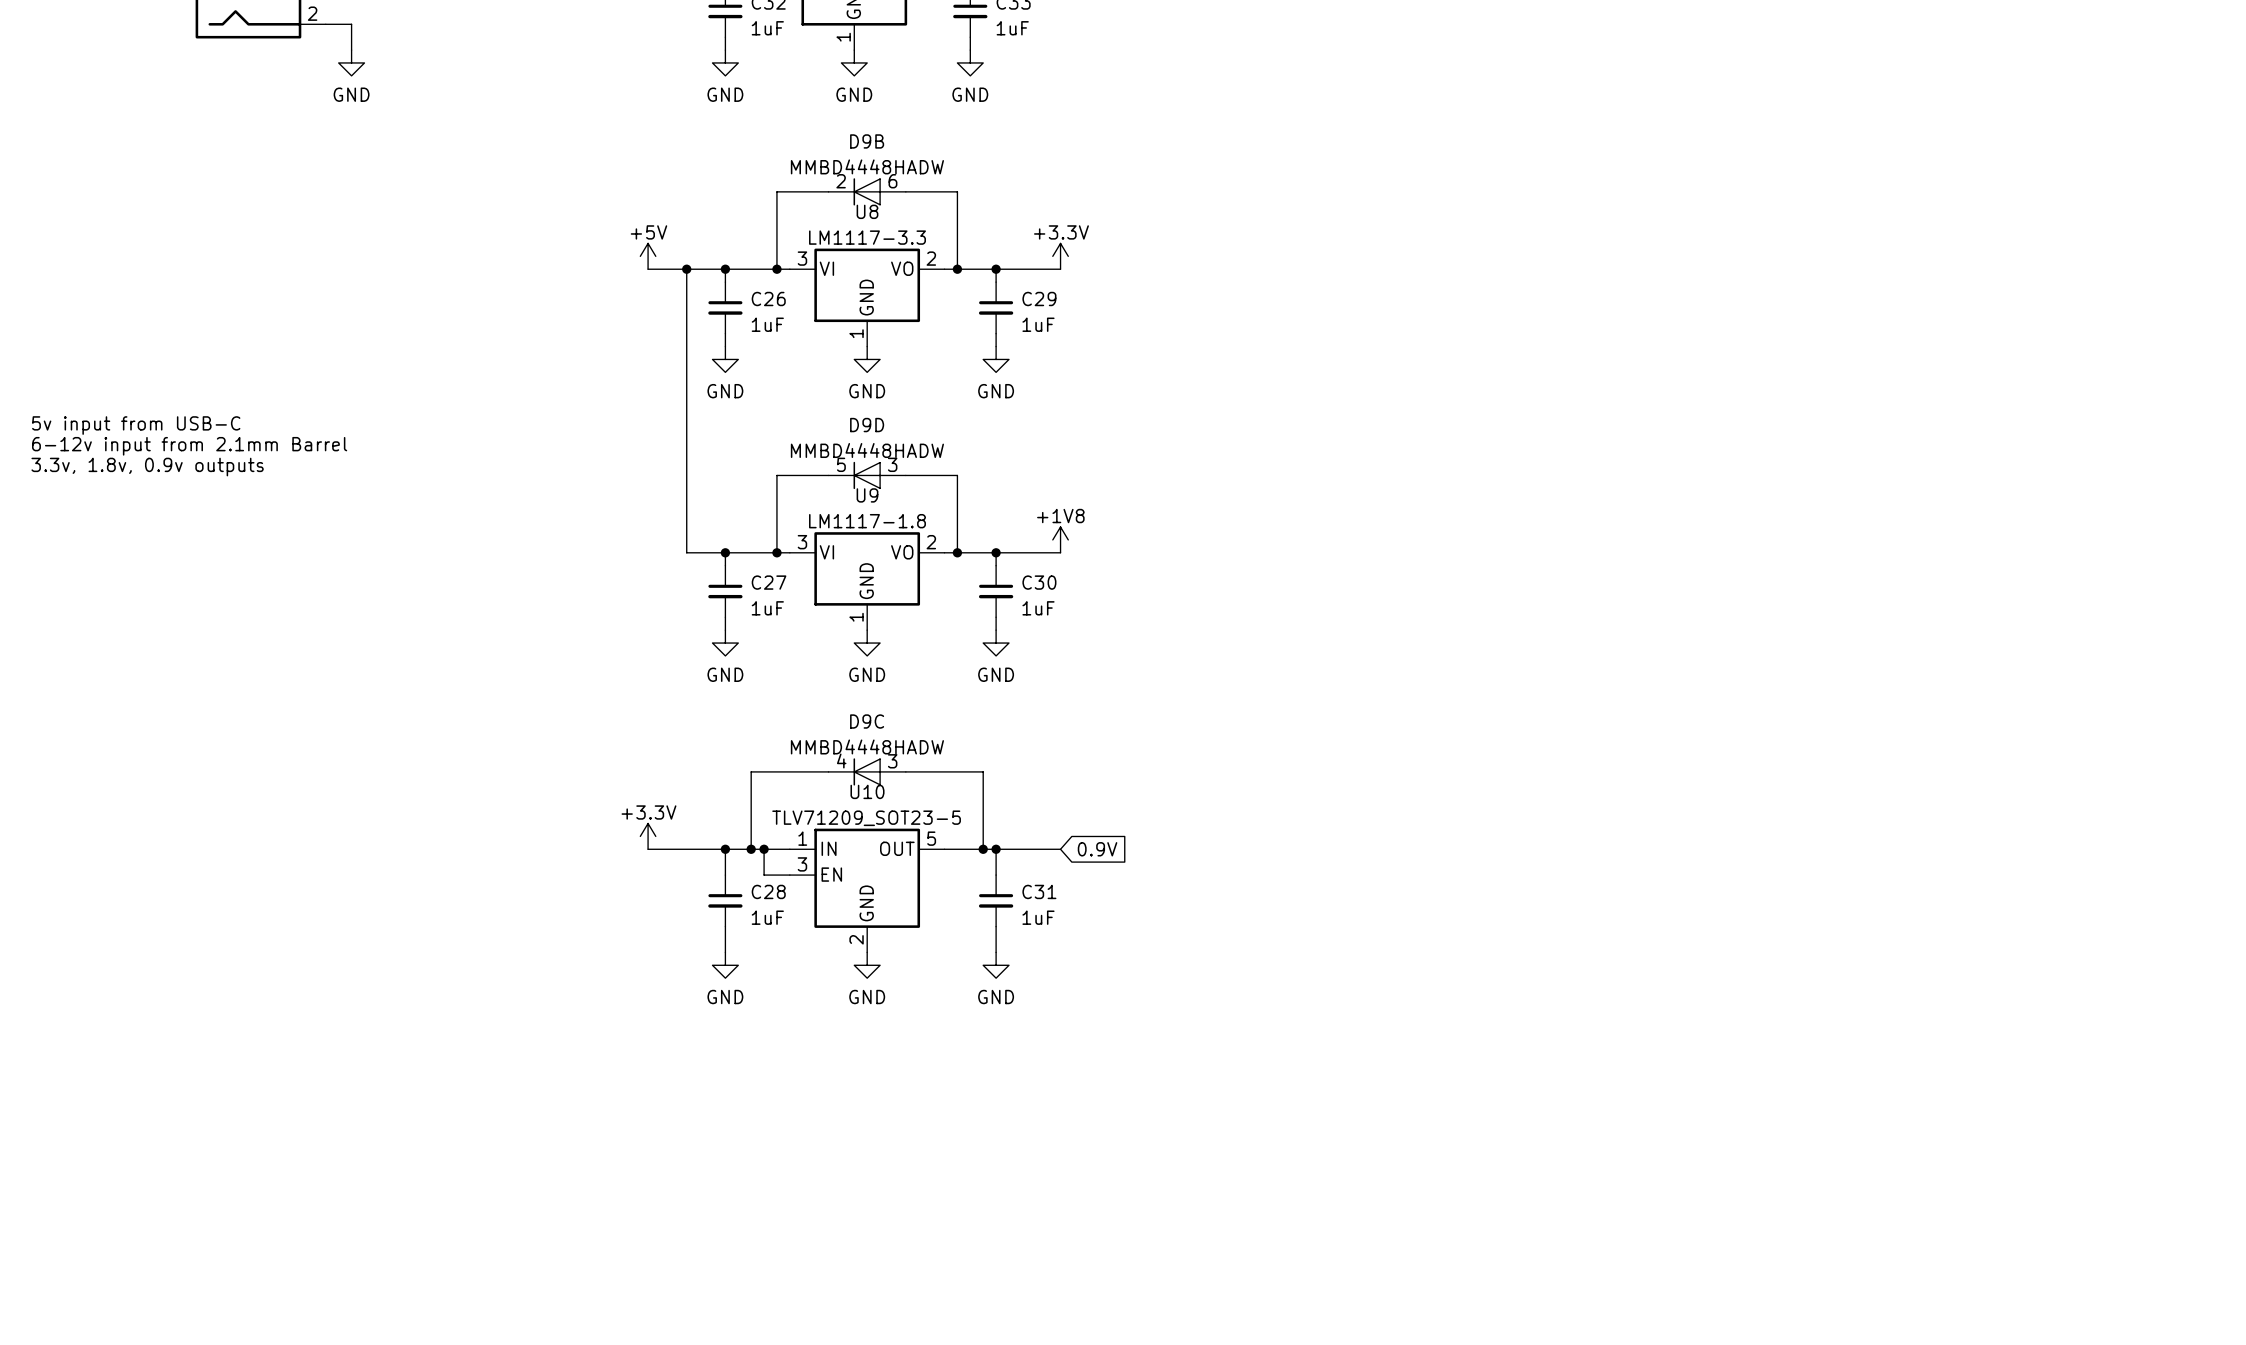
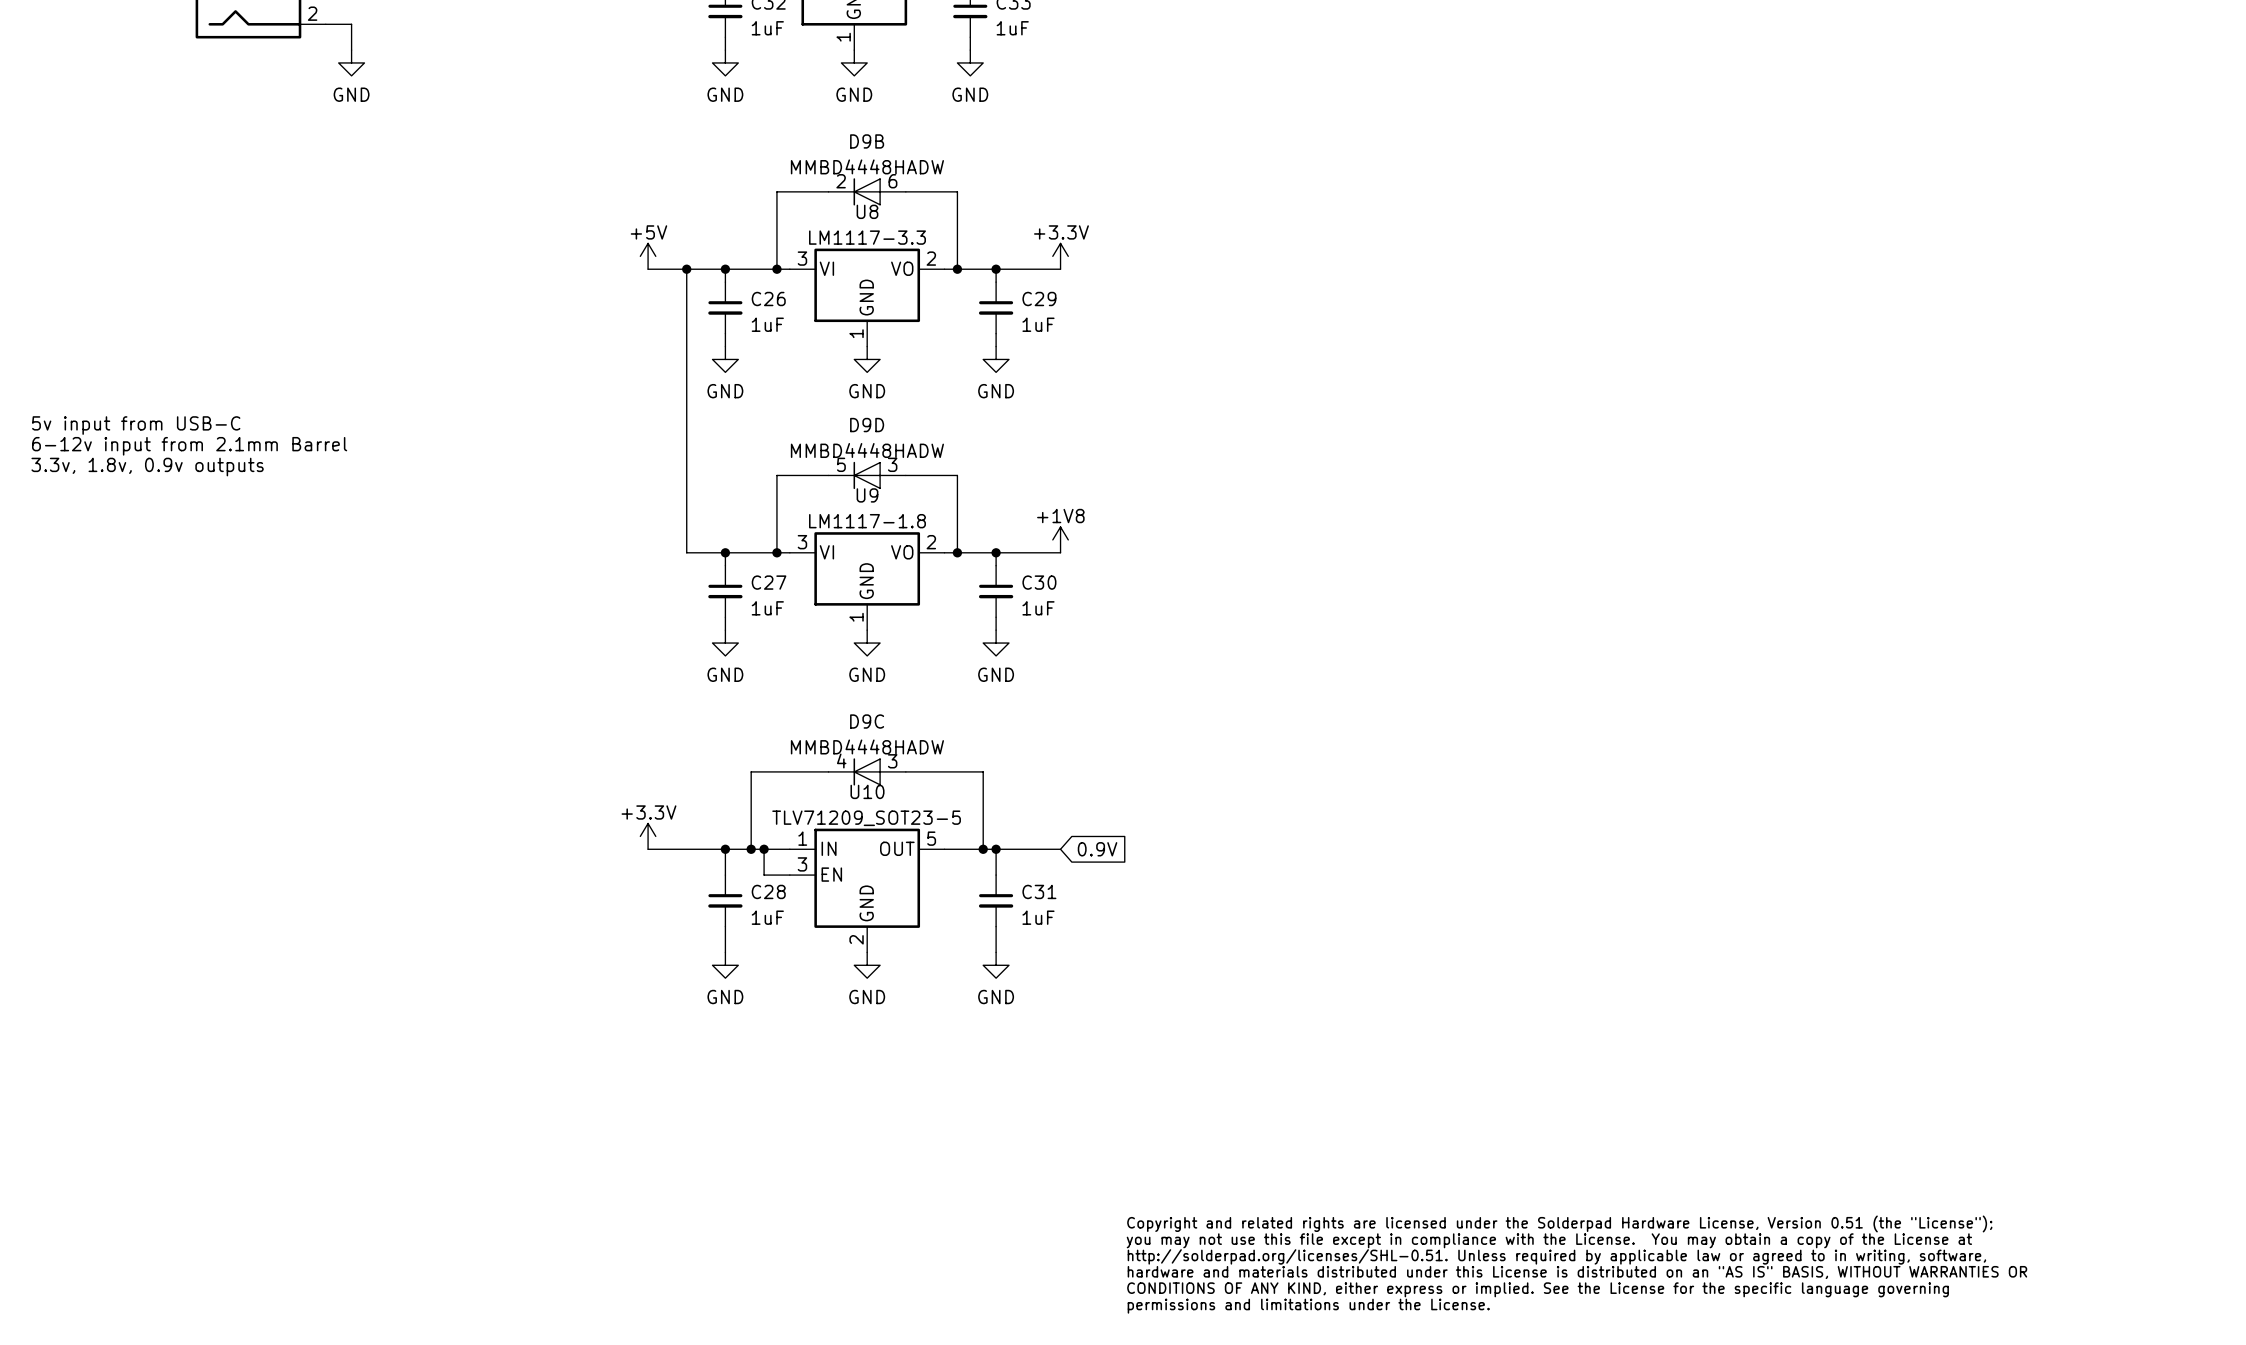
text: none -> Copyright and related rights are licensed under the Solderpad Hardware License, Version 0.51 (the "License"); (1559, 1223)
text: none -> you may not use this file except in compliance with the License. You may obtain a copy of the License at (1549, 1240)
text: none -> http://solderpad.org/licenses/SHL-0.51. Unless required by applicable law or agreed to in writing, software, (1556, 1256)
text: none -> hardware and materials distributed under this License is distributed on an "AS IS" BASIS, WITHOUT WARRANTIES OR (1577, 1272)
text: none -> CONDITIONS OF ANY KIND, either express or implied. See the License for the specific language governing (1538, 1289)
text: none -> permissions and limitations under the License. (1308, 1306)

